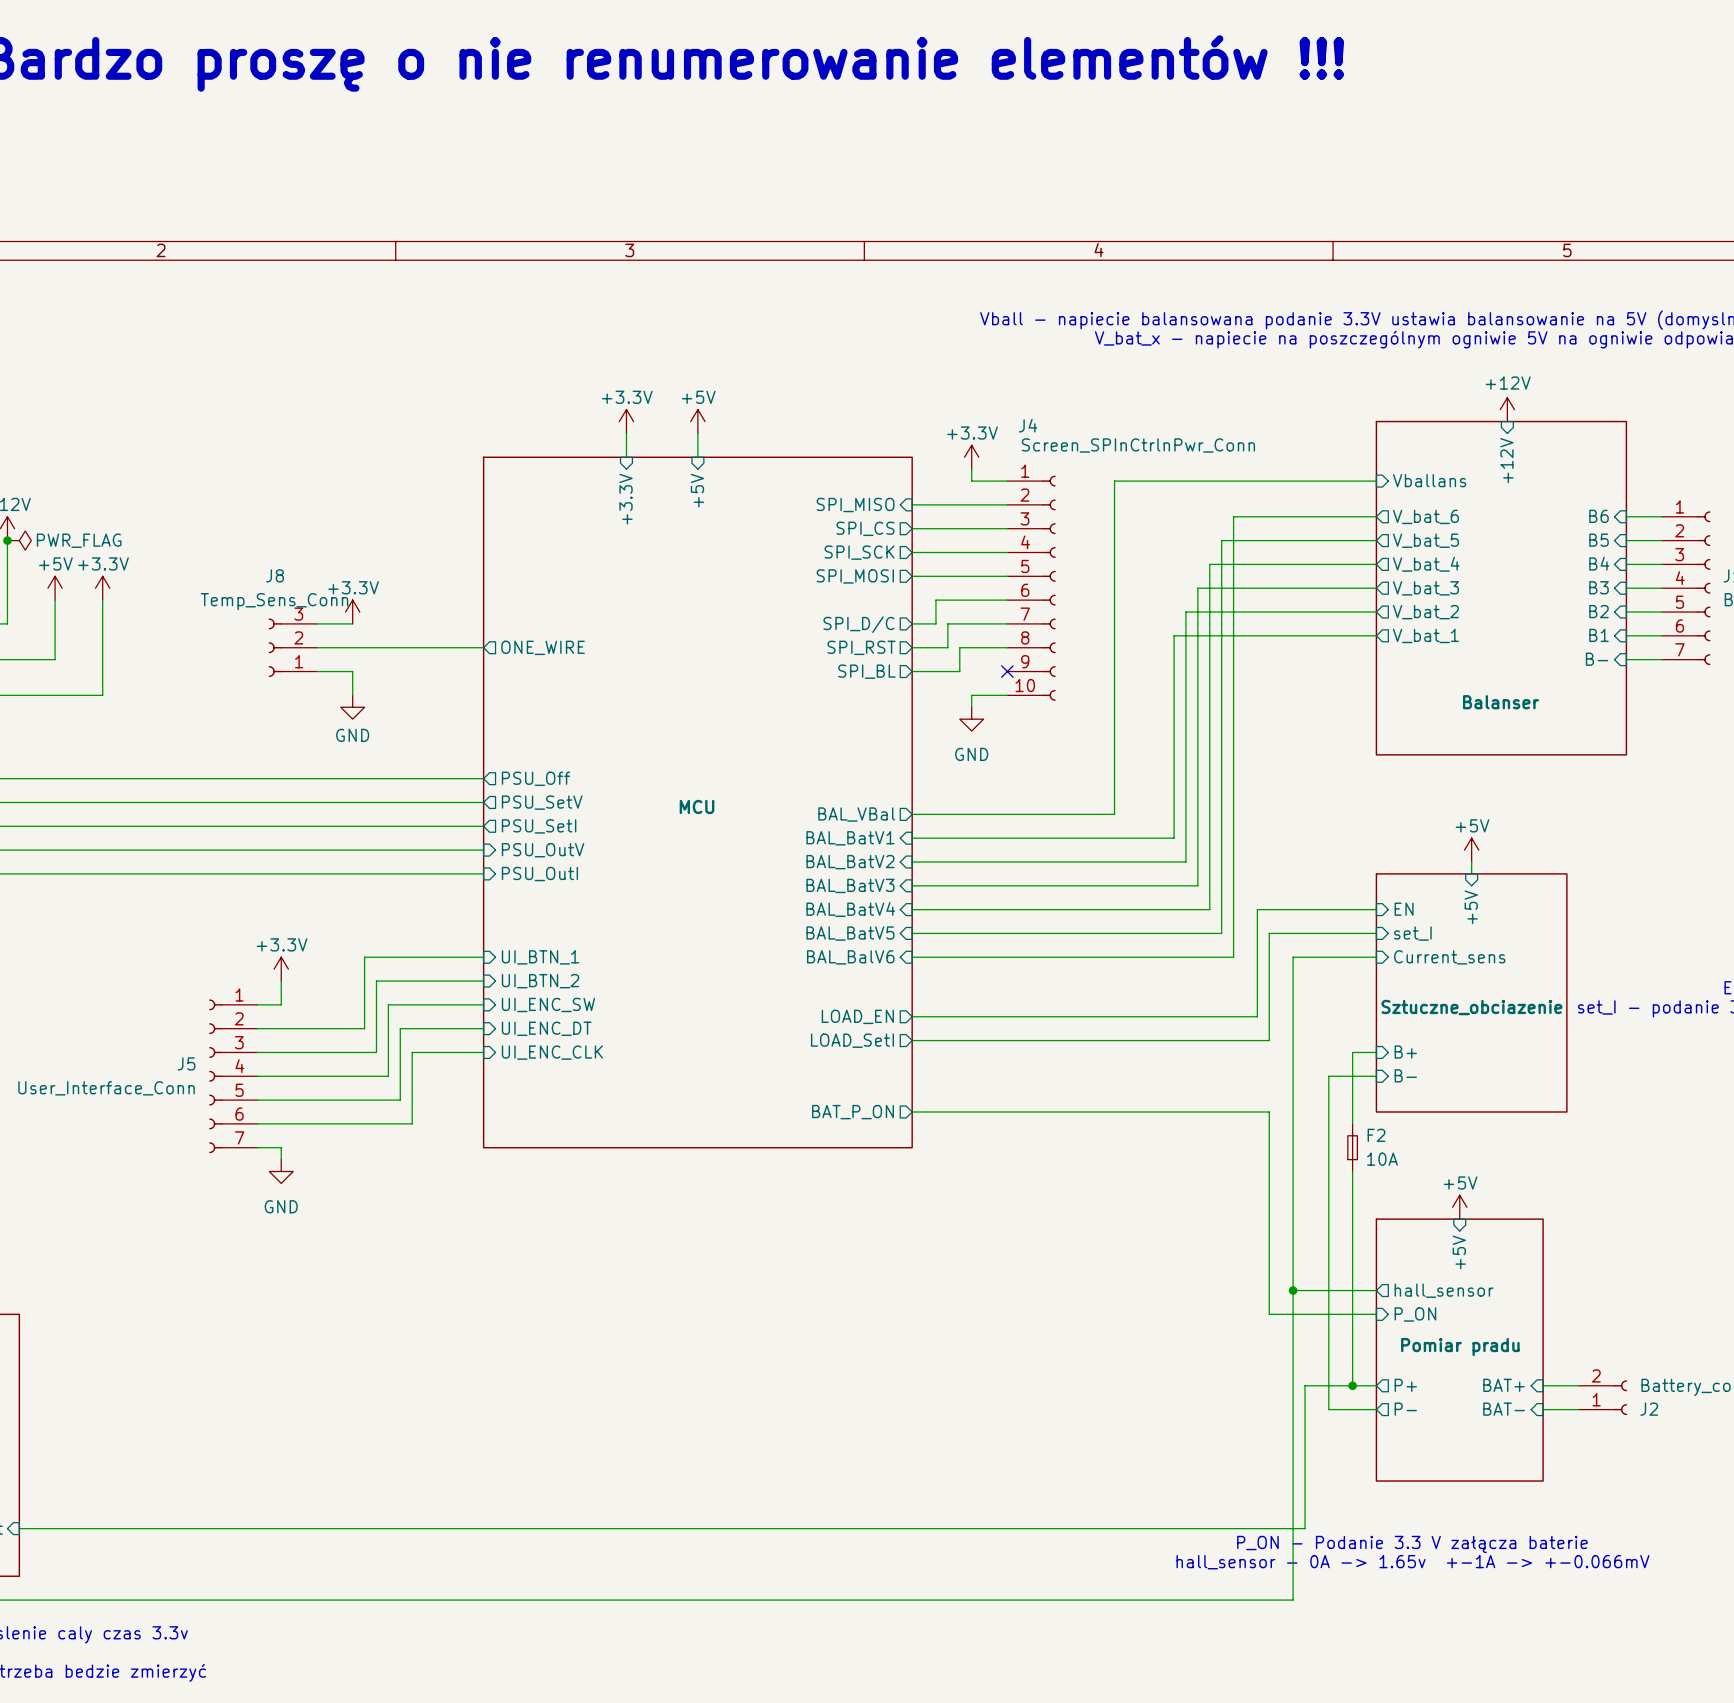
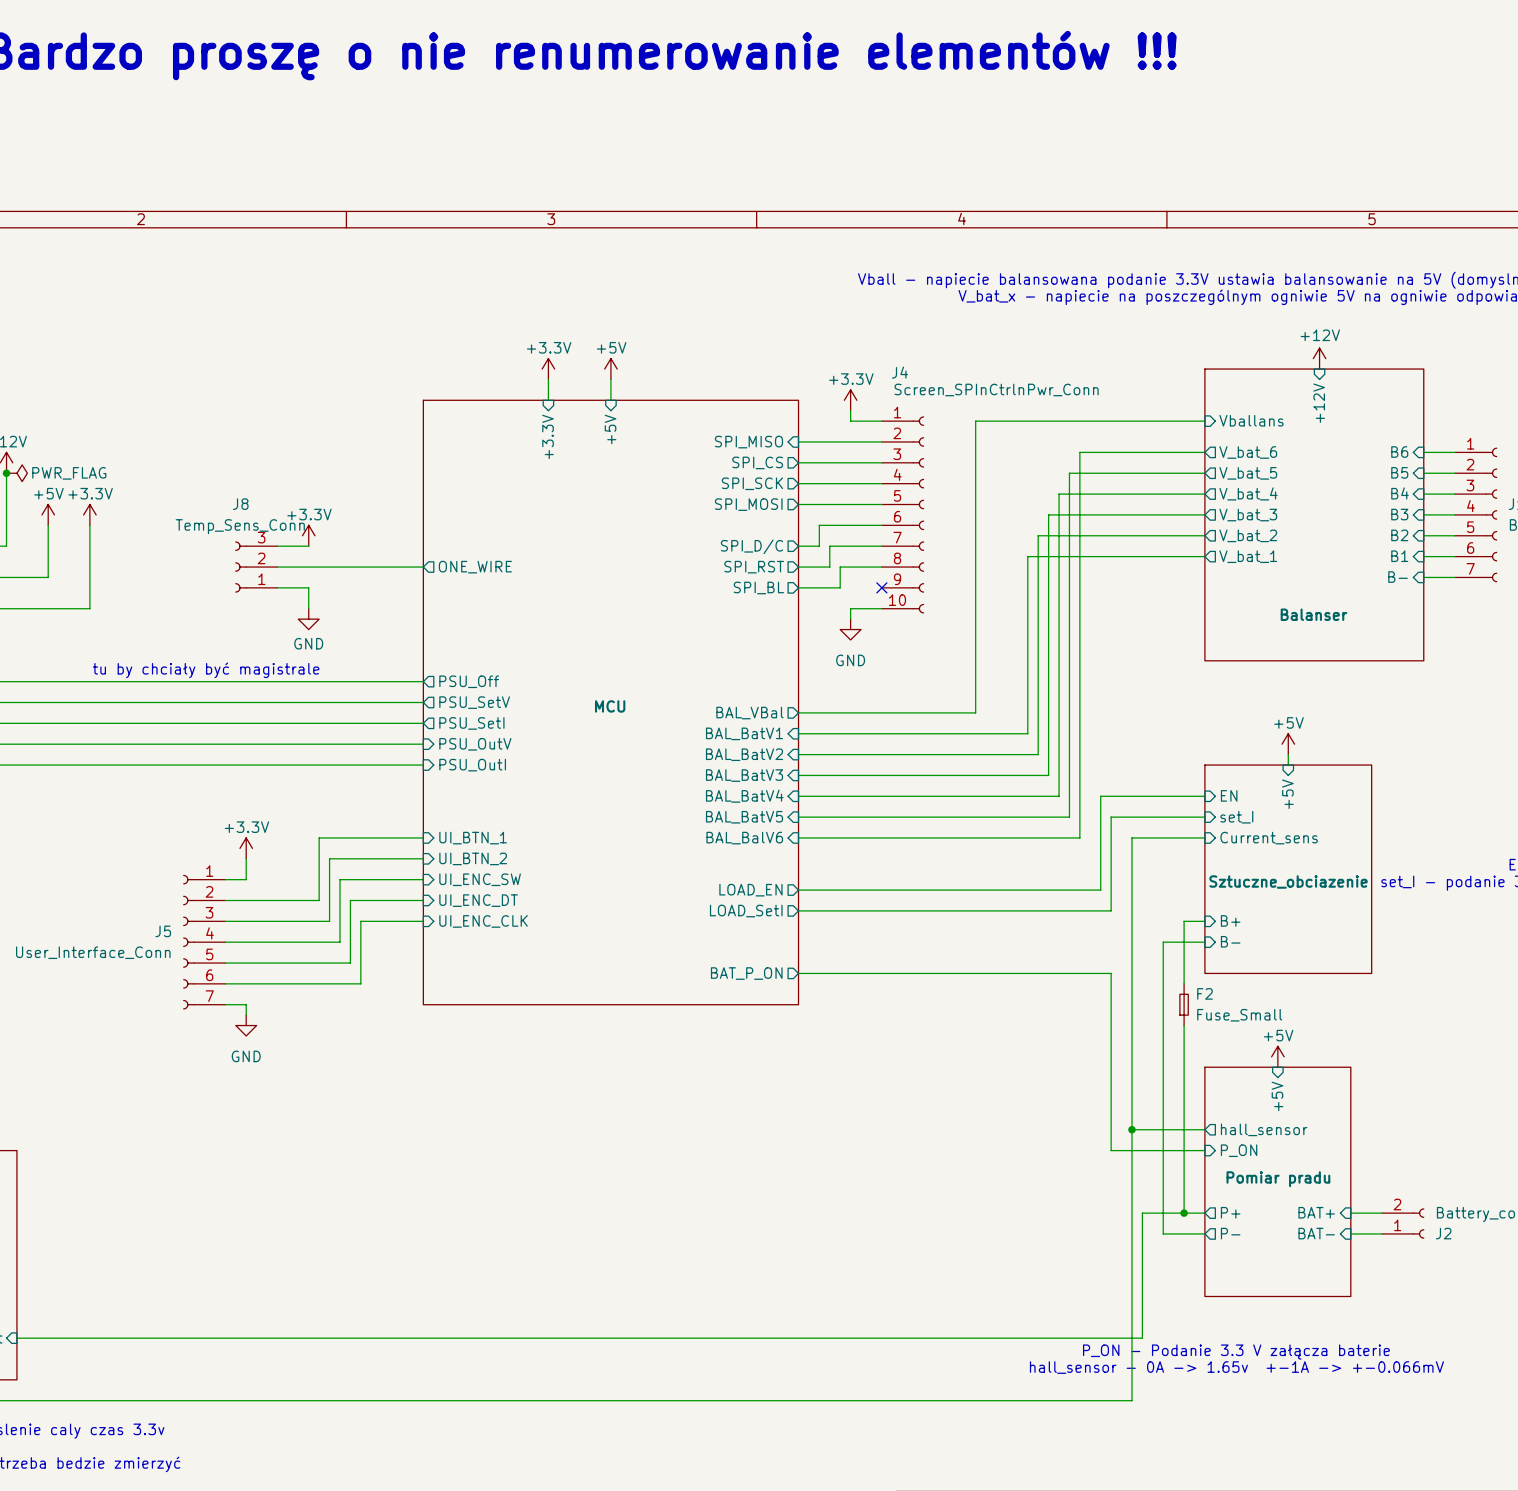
text: none -> tu by chciały być magistrale (206, 670)
F2 value: 10A (1382, 1159) -> Fuse_Small (1239, 1015)

